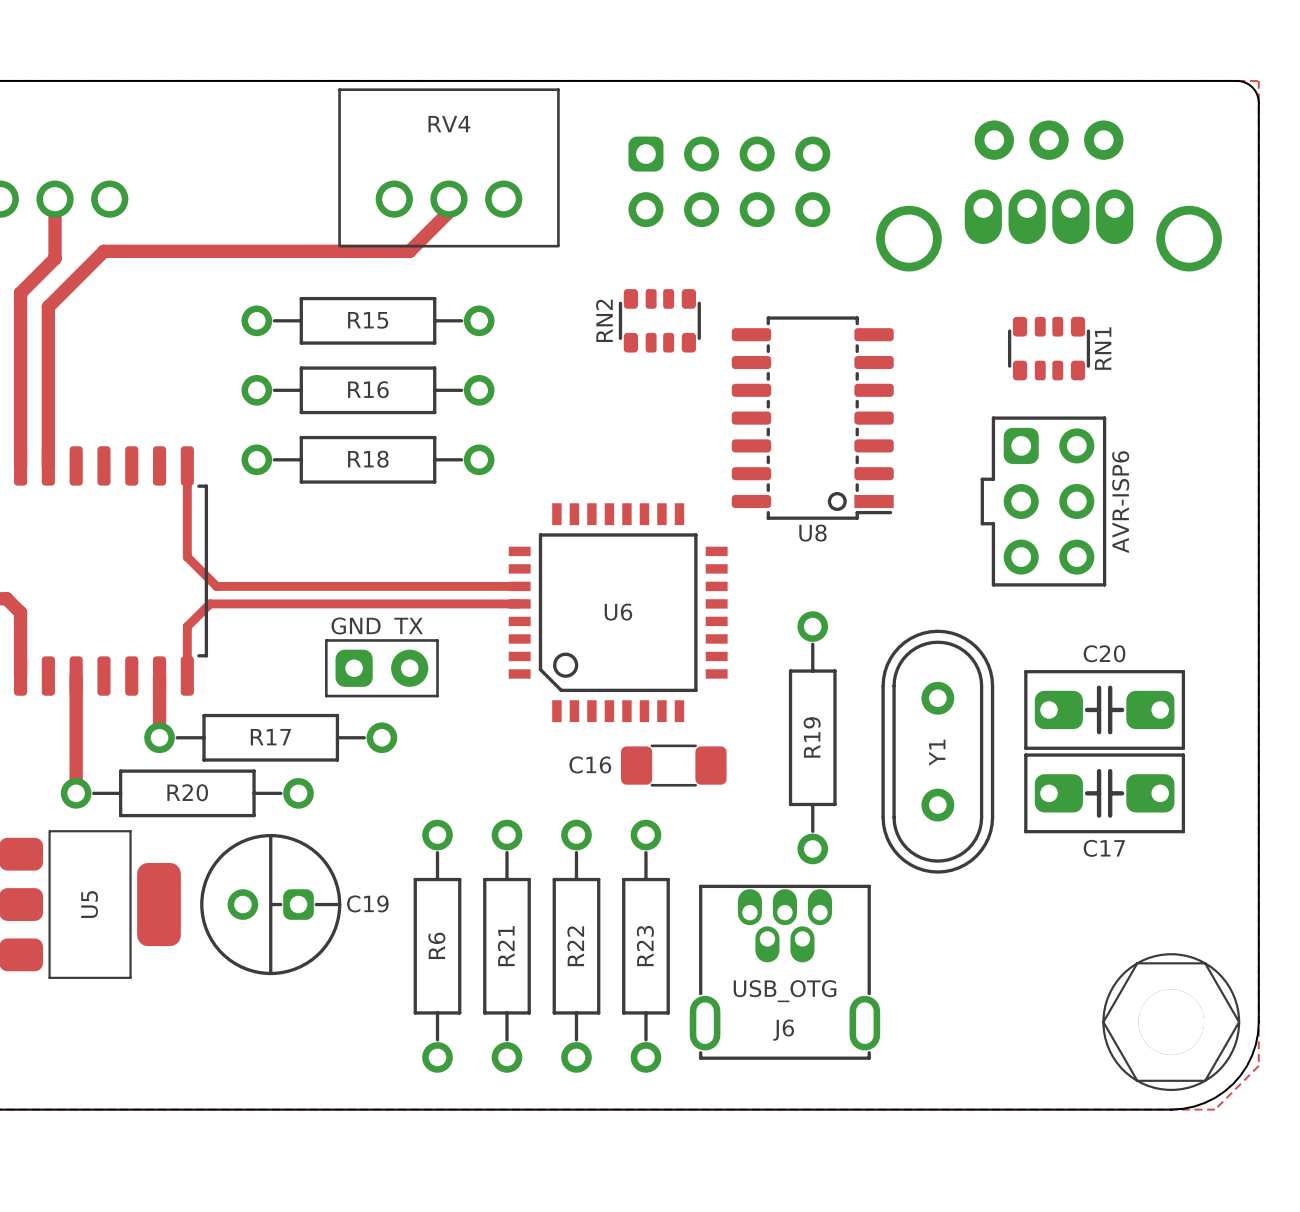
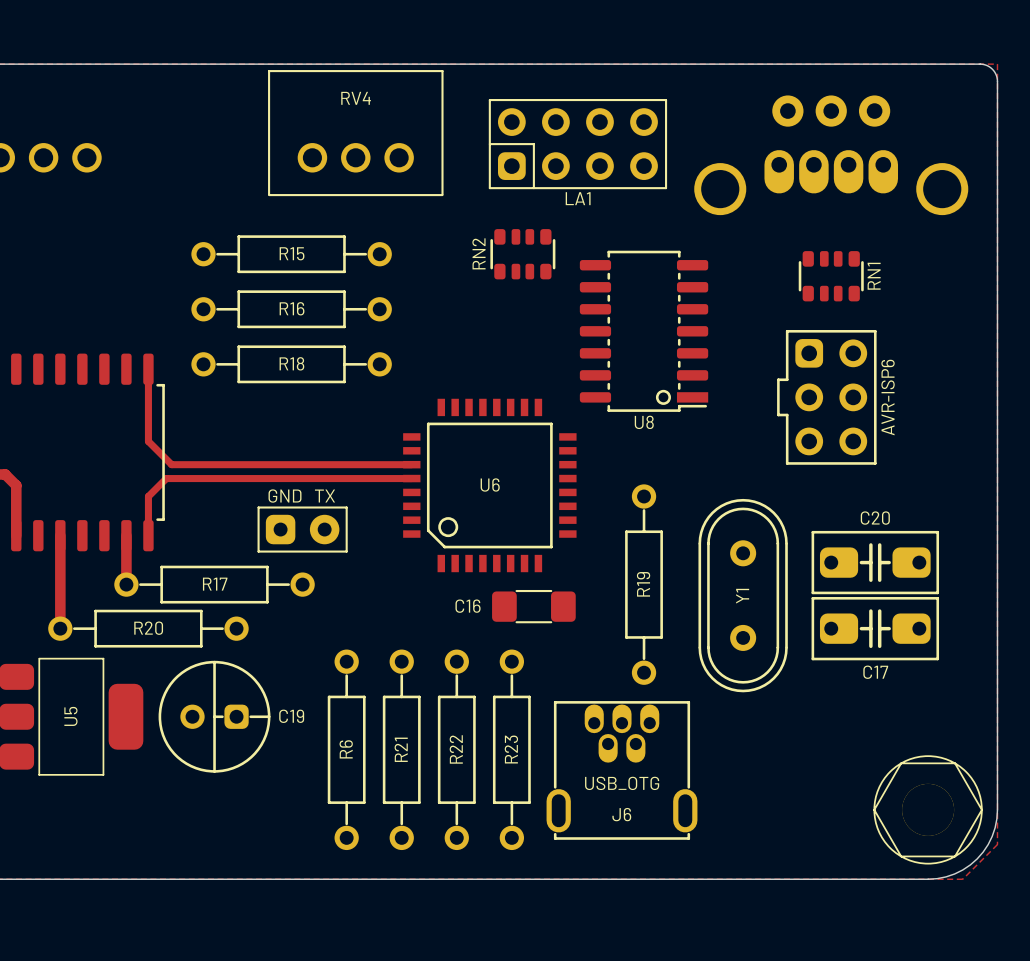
LA1 side: bottom (729, 181) -> top (577, 144)
track: (55, 199) (55, 258) (20, 293) (20, 465) -> none
track: (448, 199) (448, 212) (409, 251) (103, 251) (48, 306) (48, 465) -> none

